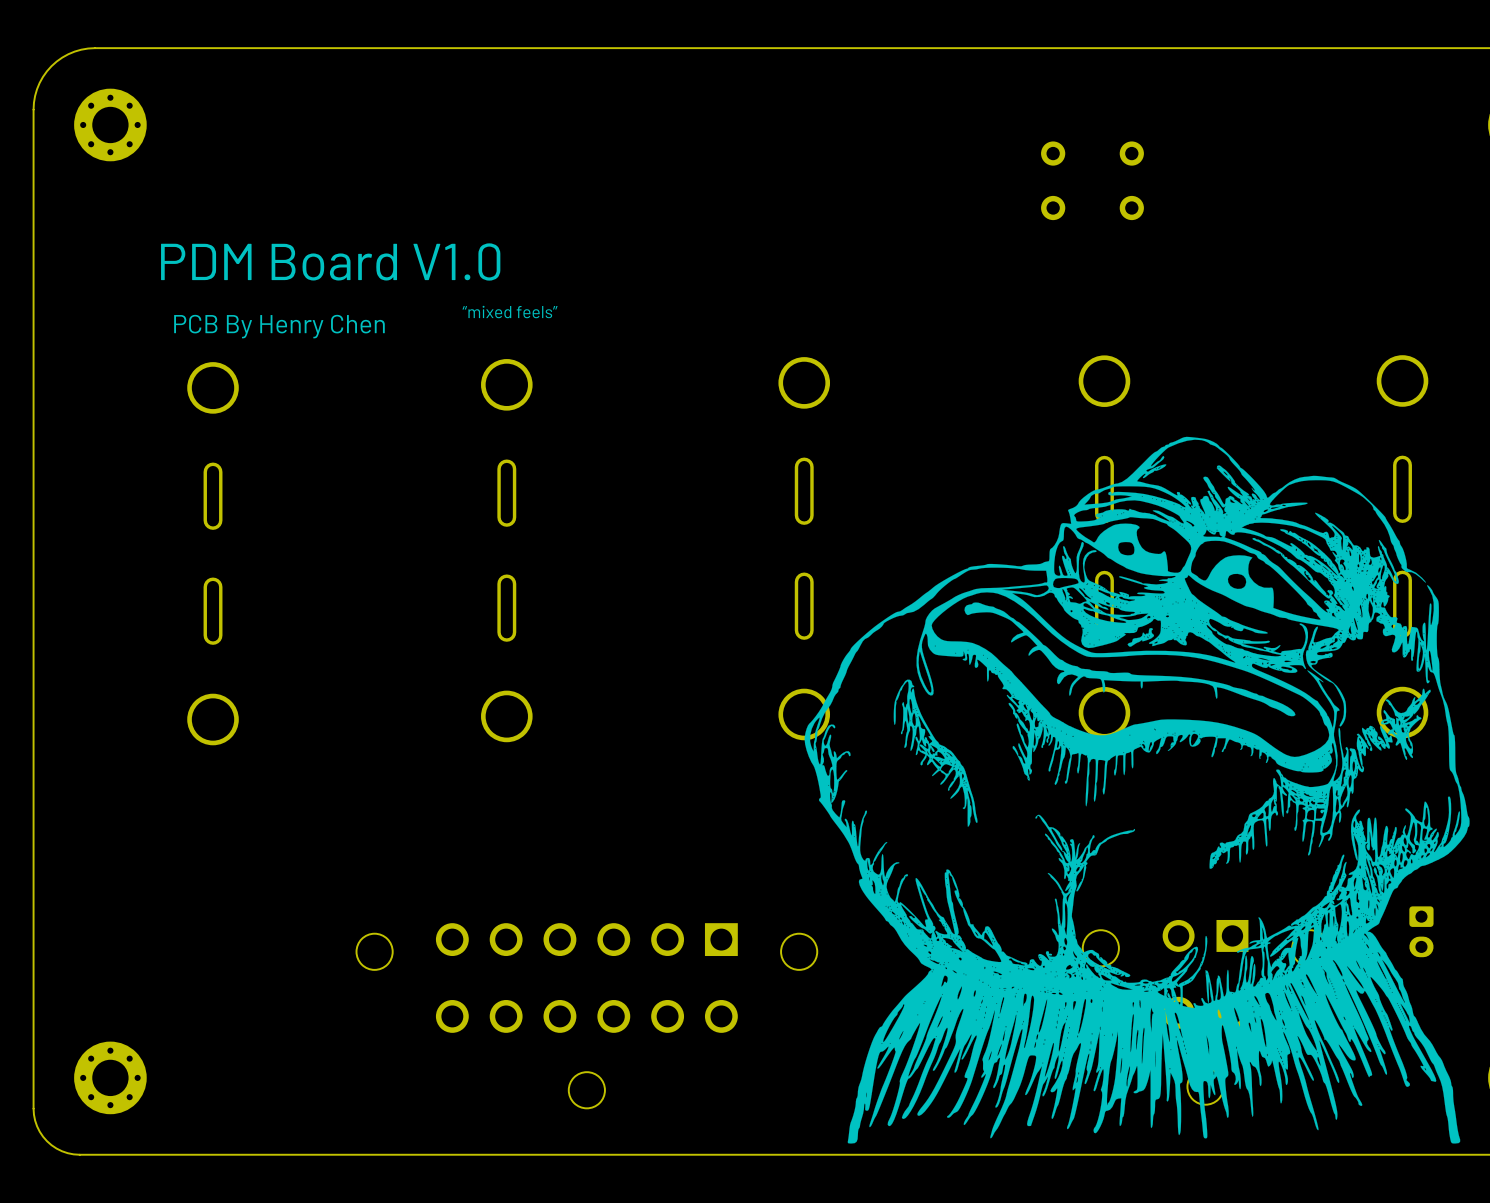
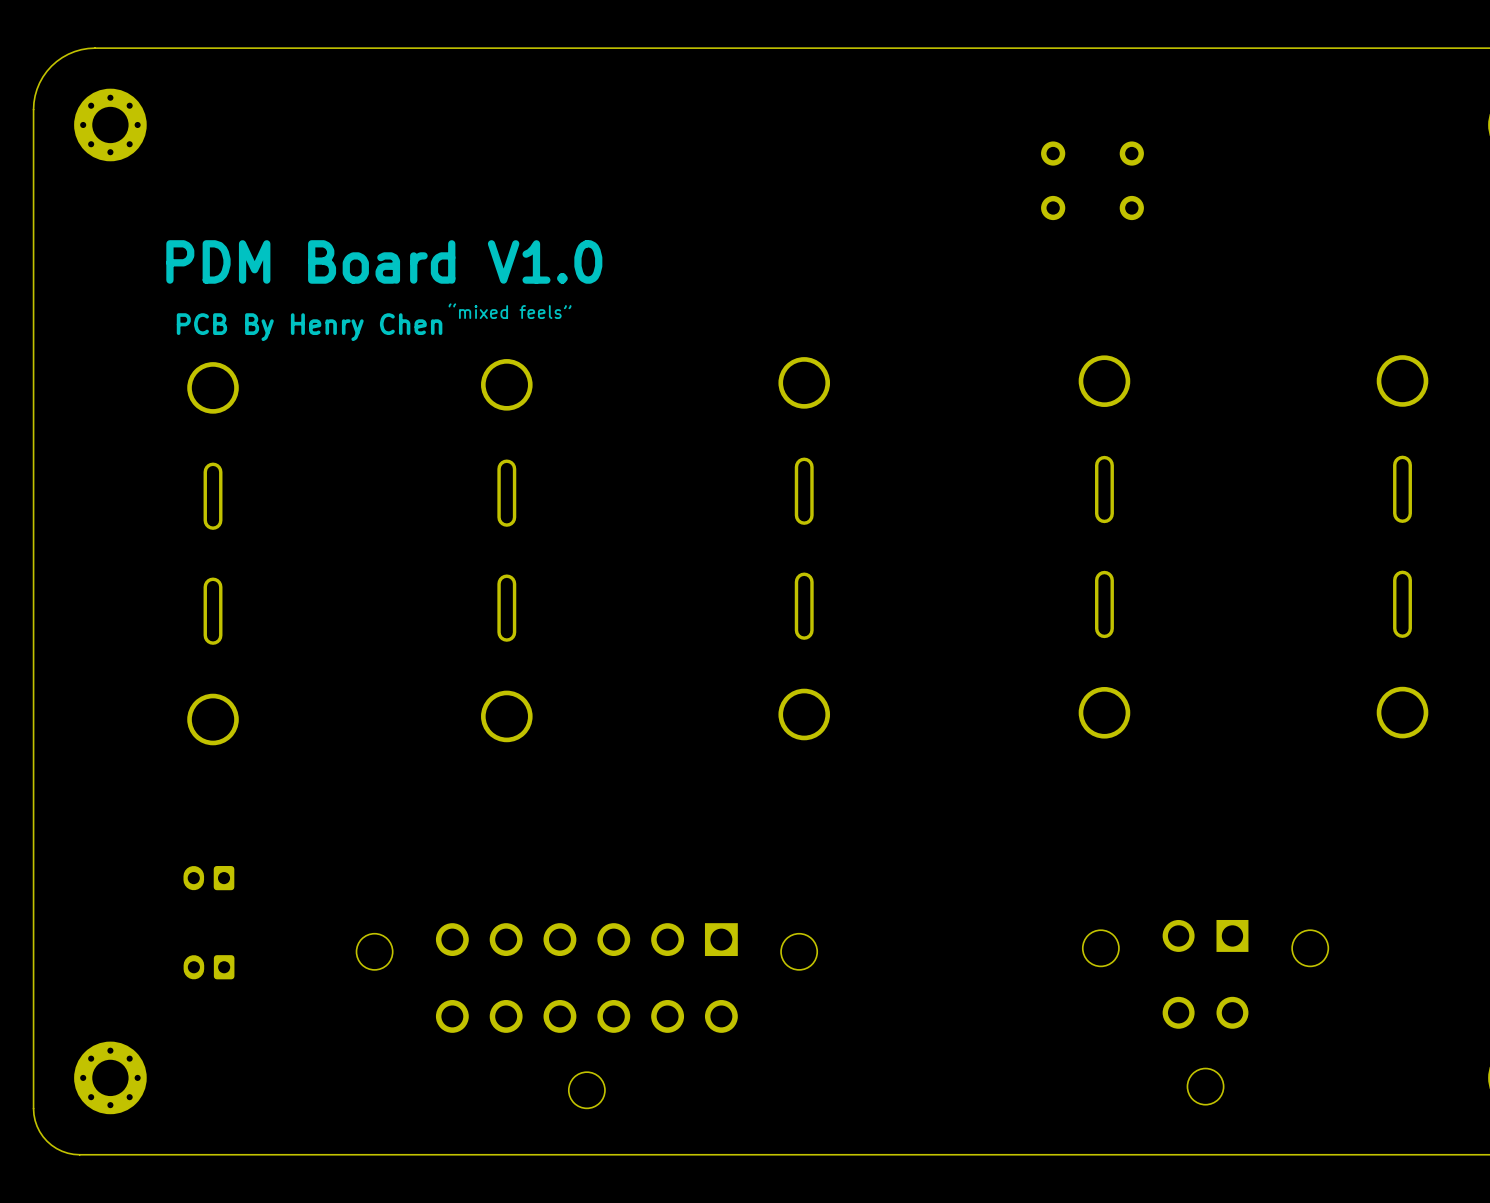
drawing: [804, 436, 1470, 1144] -> none
part: none -> (208, 878)
part: (1421, 931) -> none
part: none -> (209, 967)

